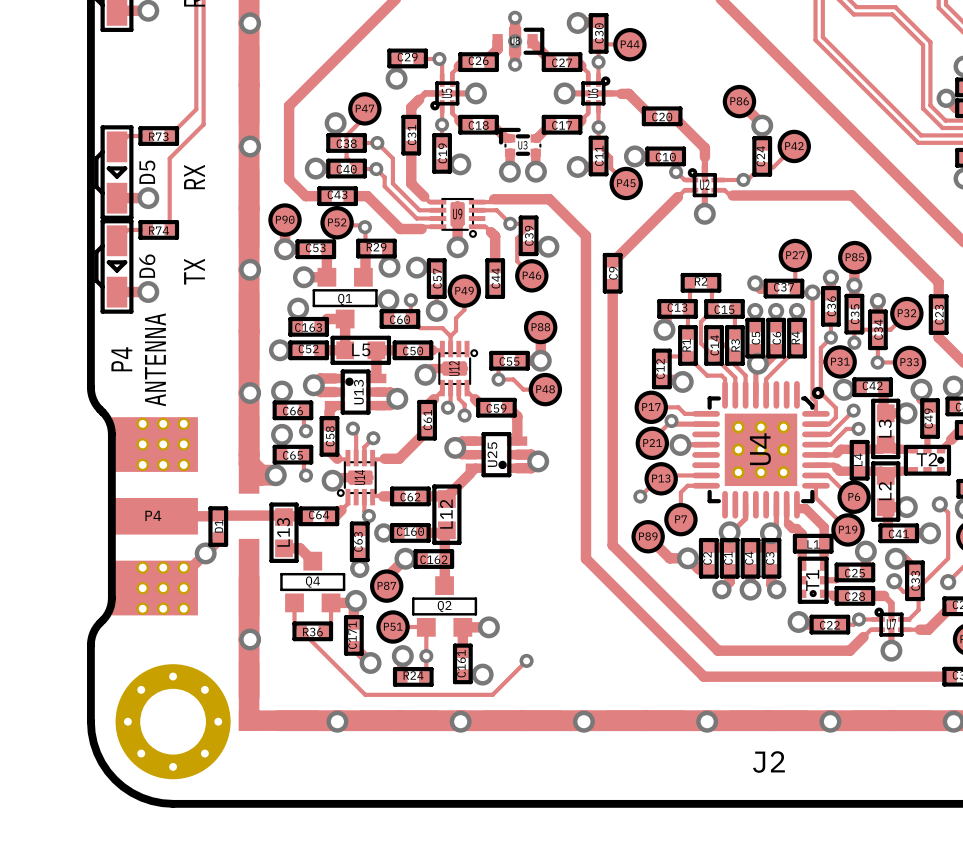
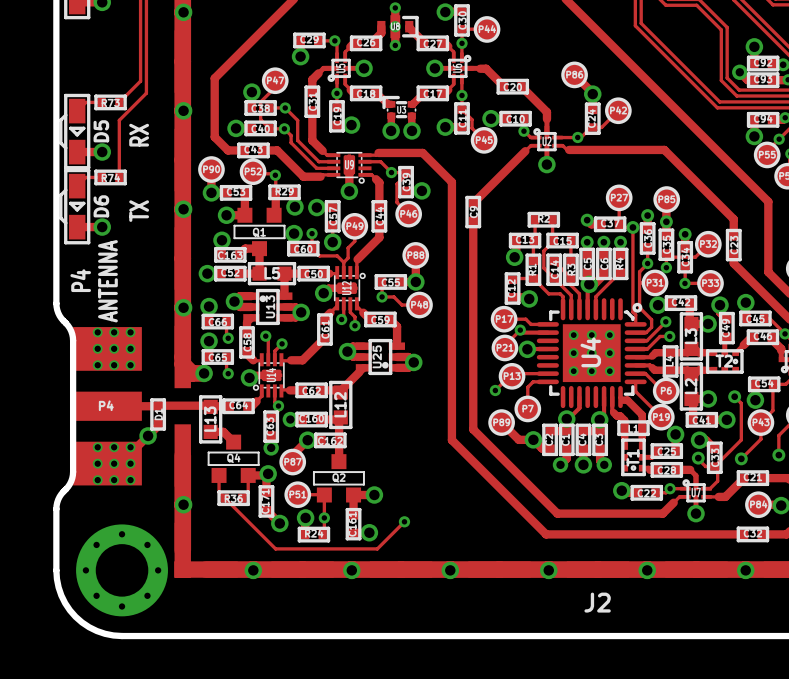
track: none -> (379, 225) (379, 237) (356, 260) (356, 272)

